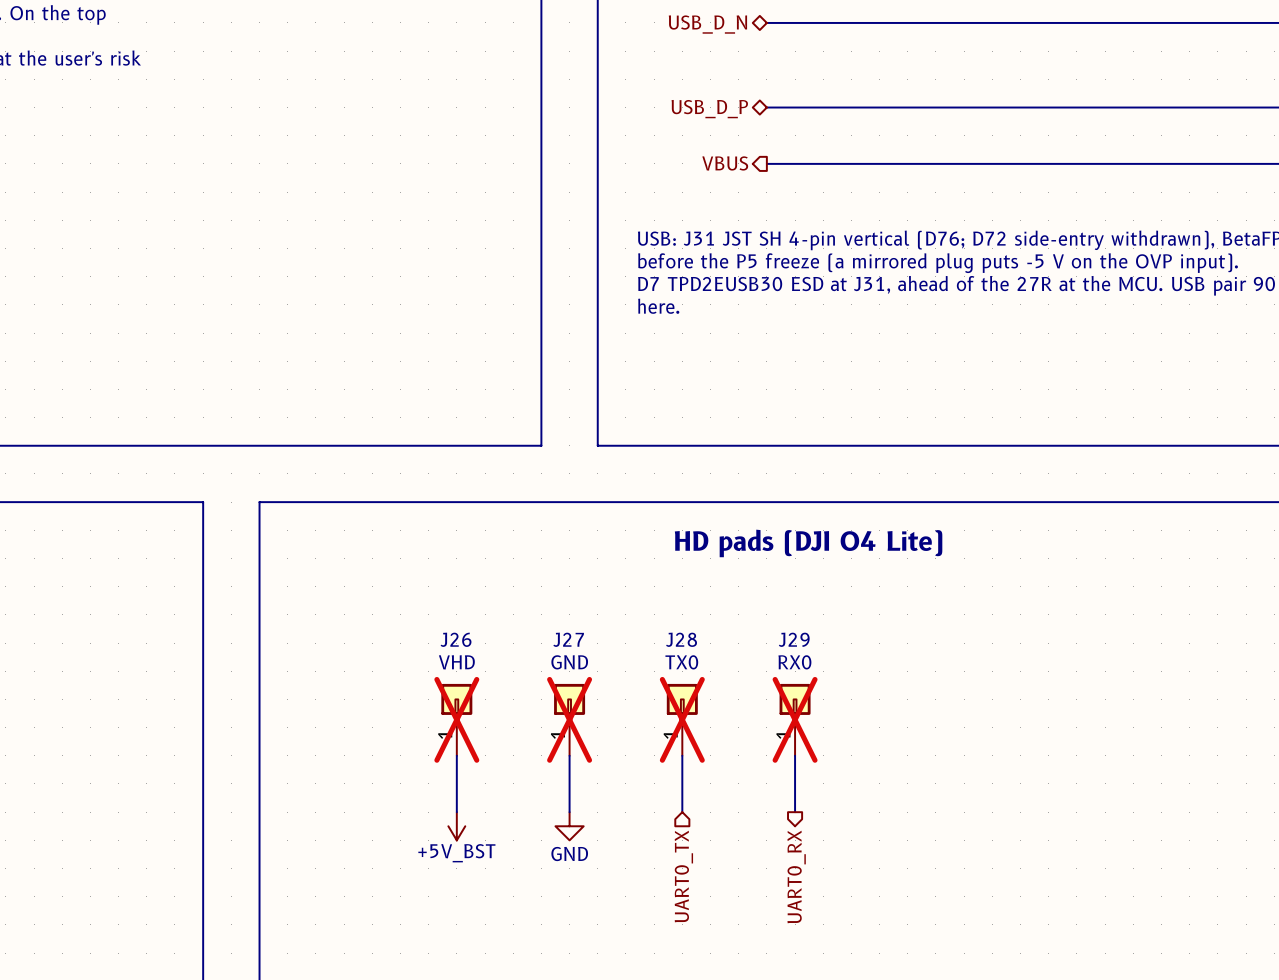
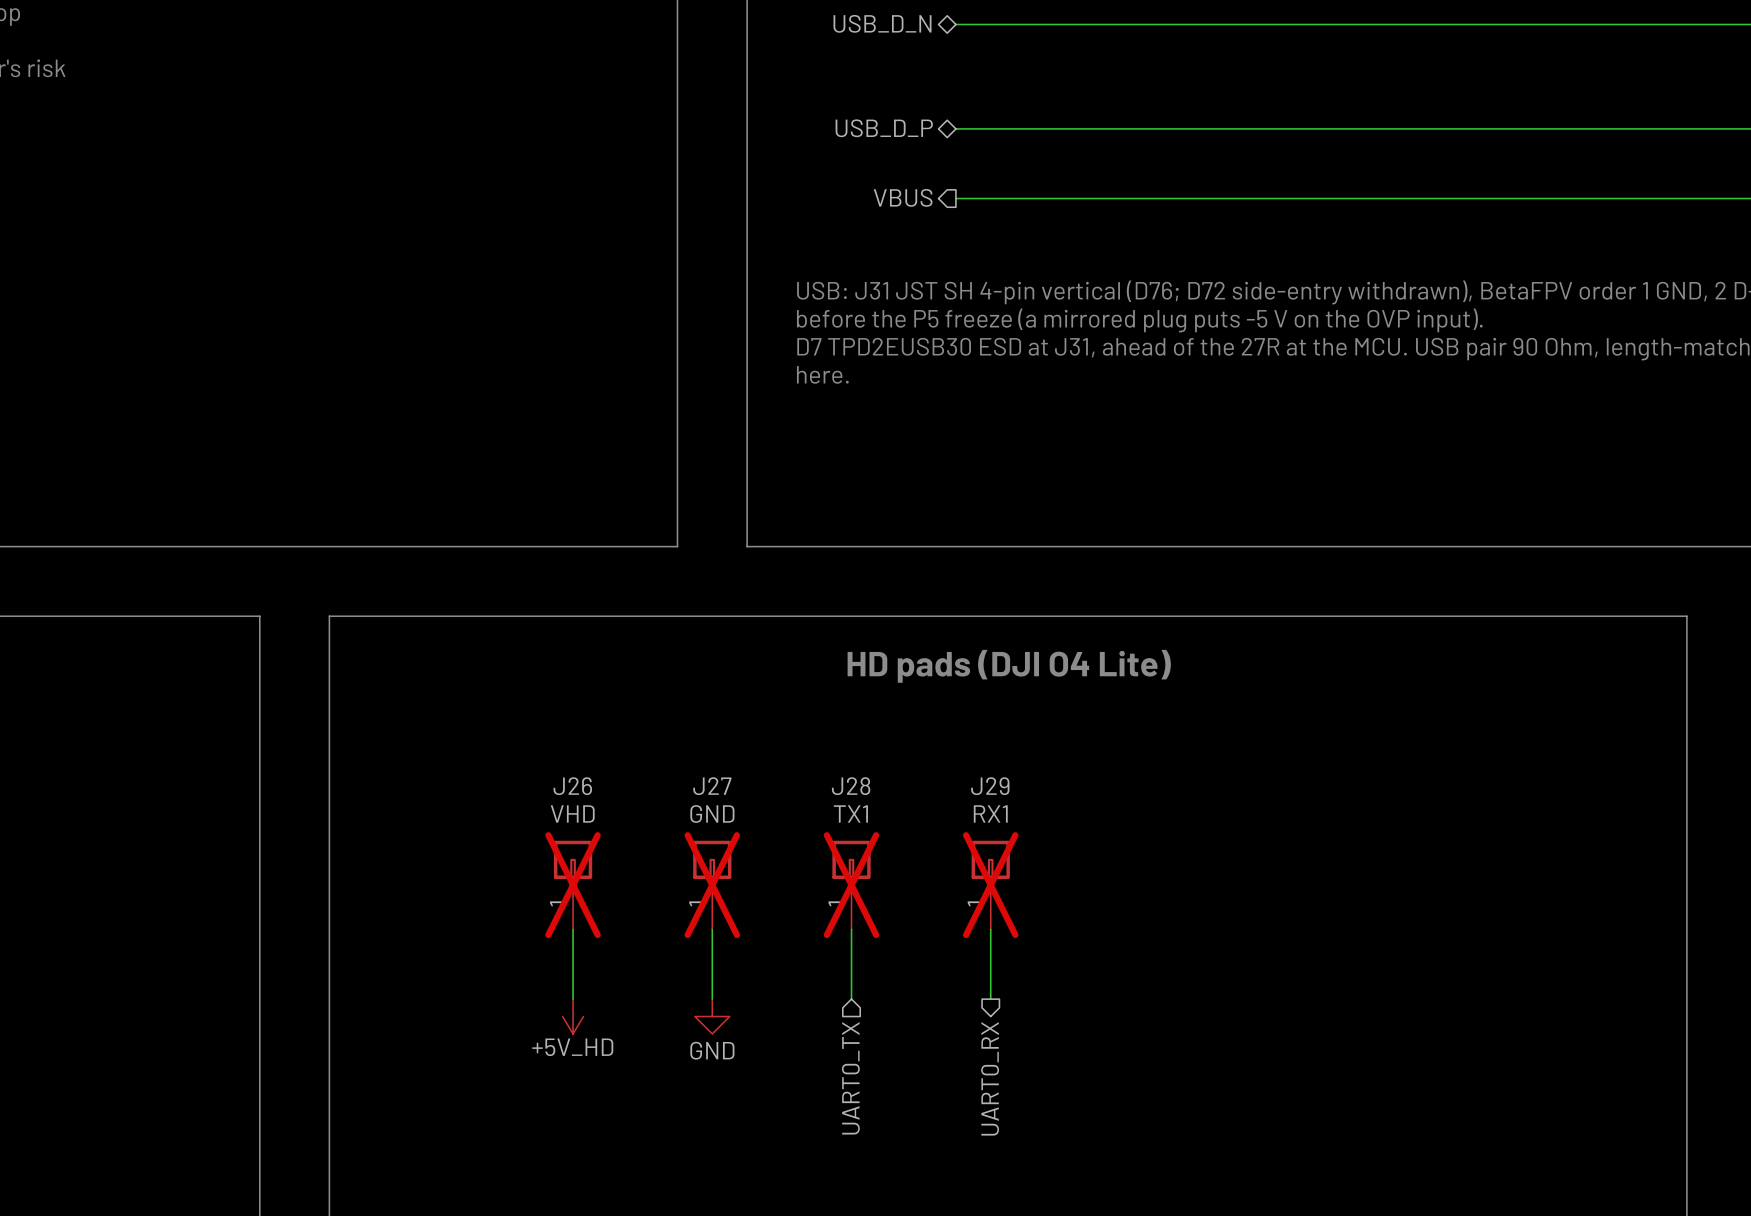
J28 value: TX0 (681, 662) -> TX1 (850, 813)
J29 value: RX0 (794, 662) -> RX1 (990, 813)
power symbol: +5V_BST (456, 826) -> +5V_HD (573, 1016)

